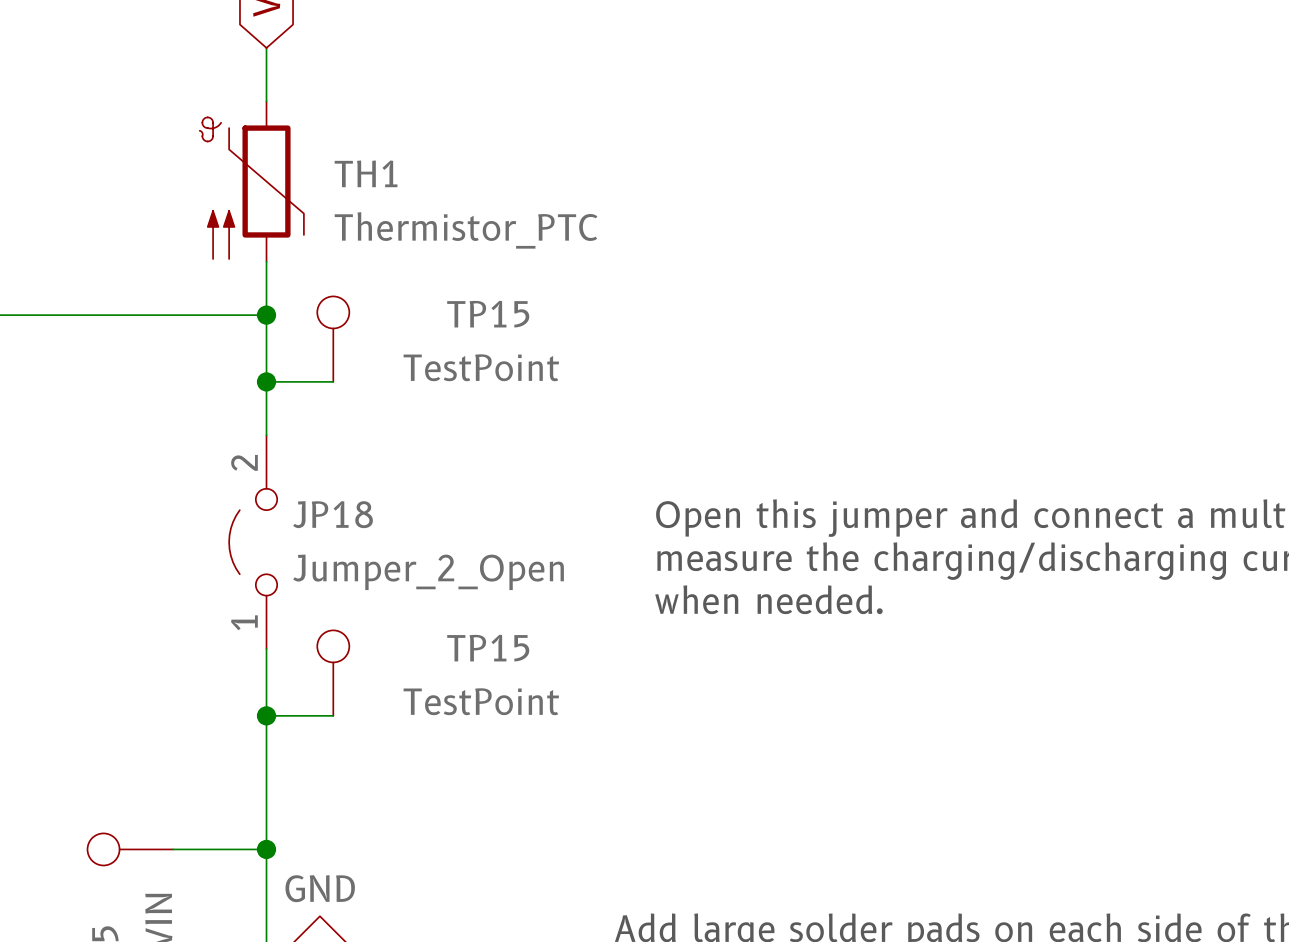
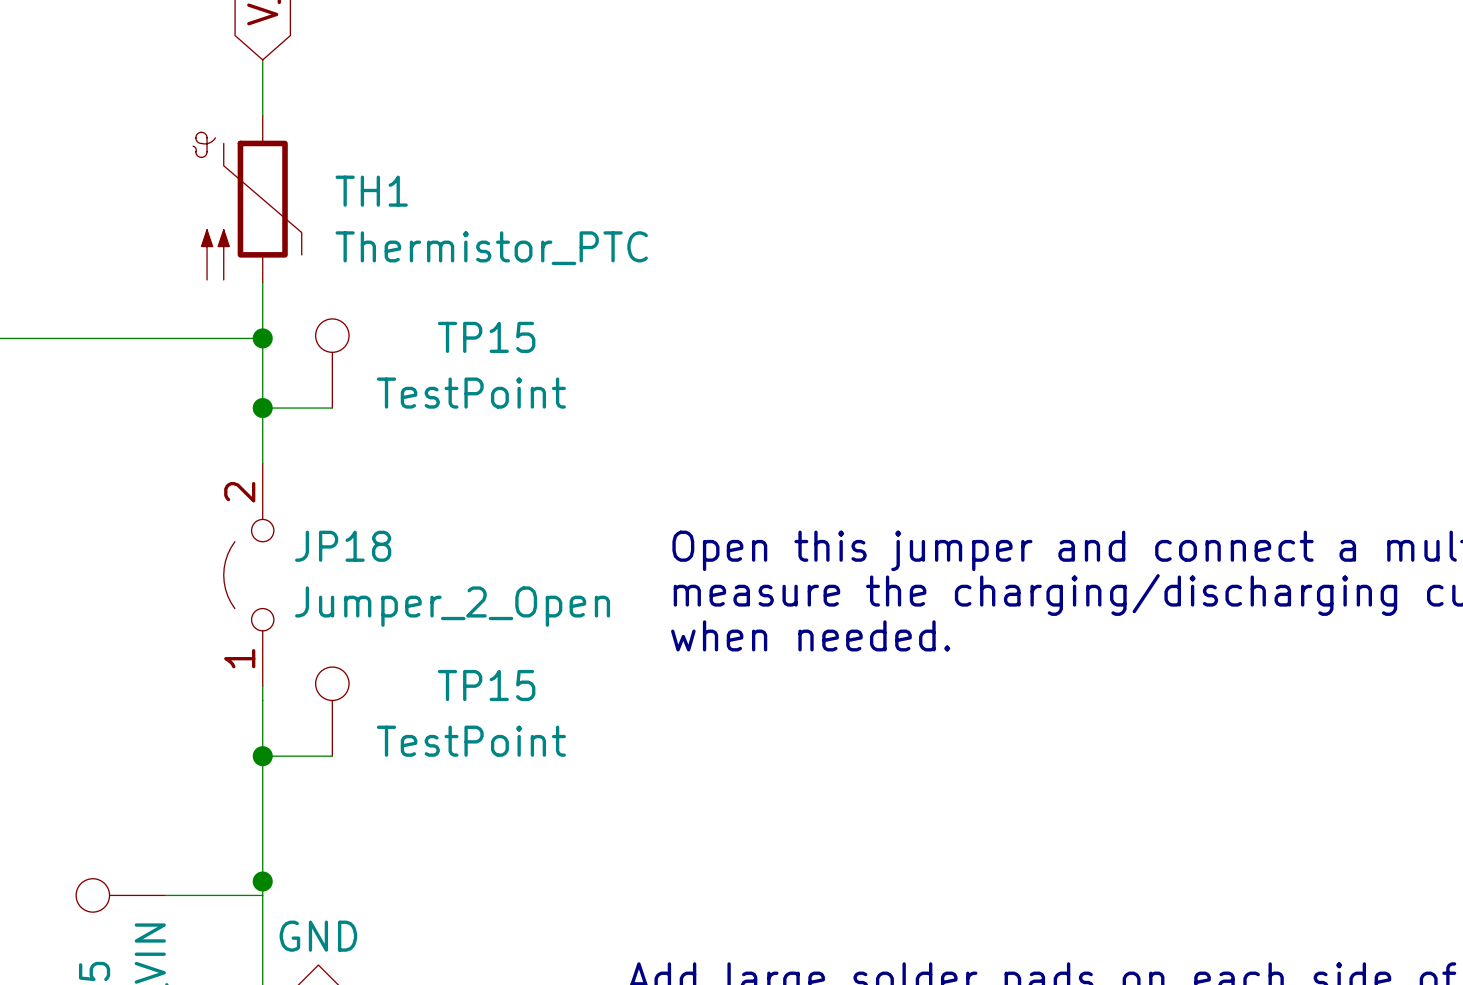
junction position: (266, 849) -> (262, 881)

